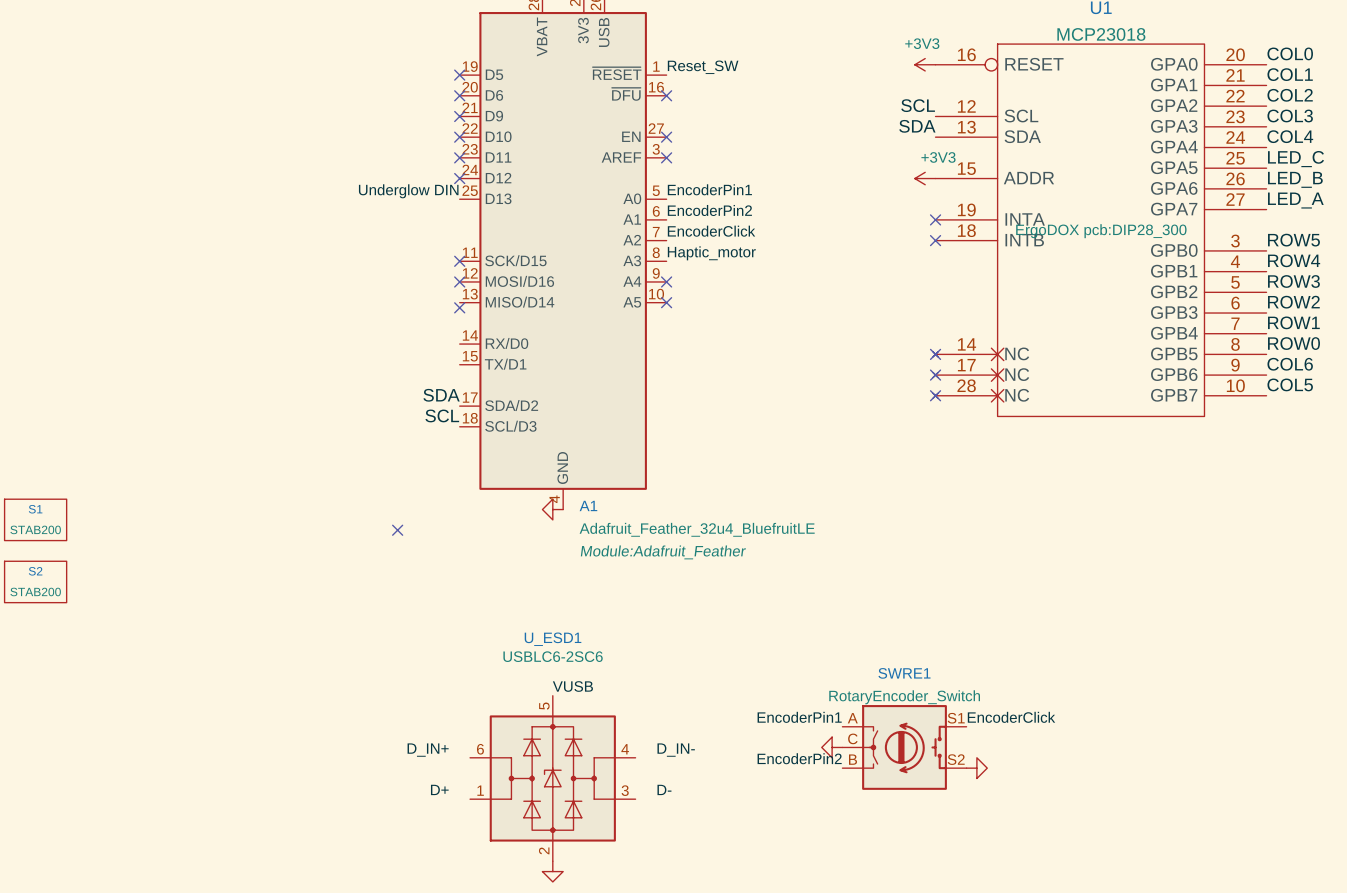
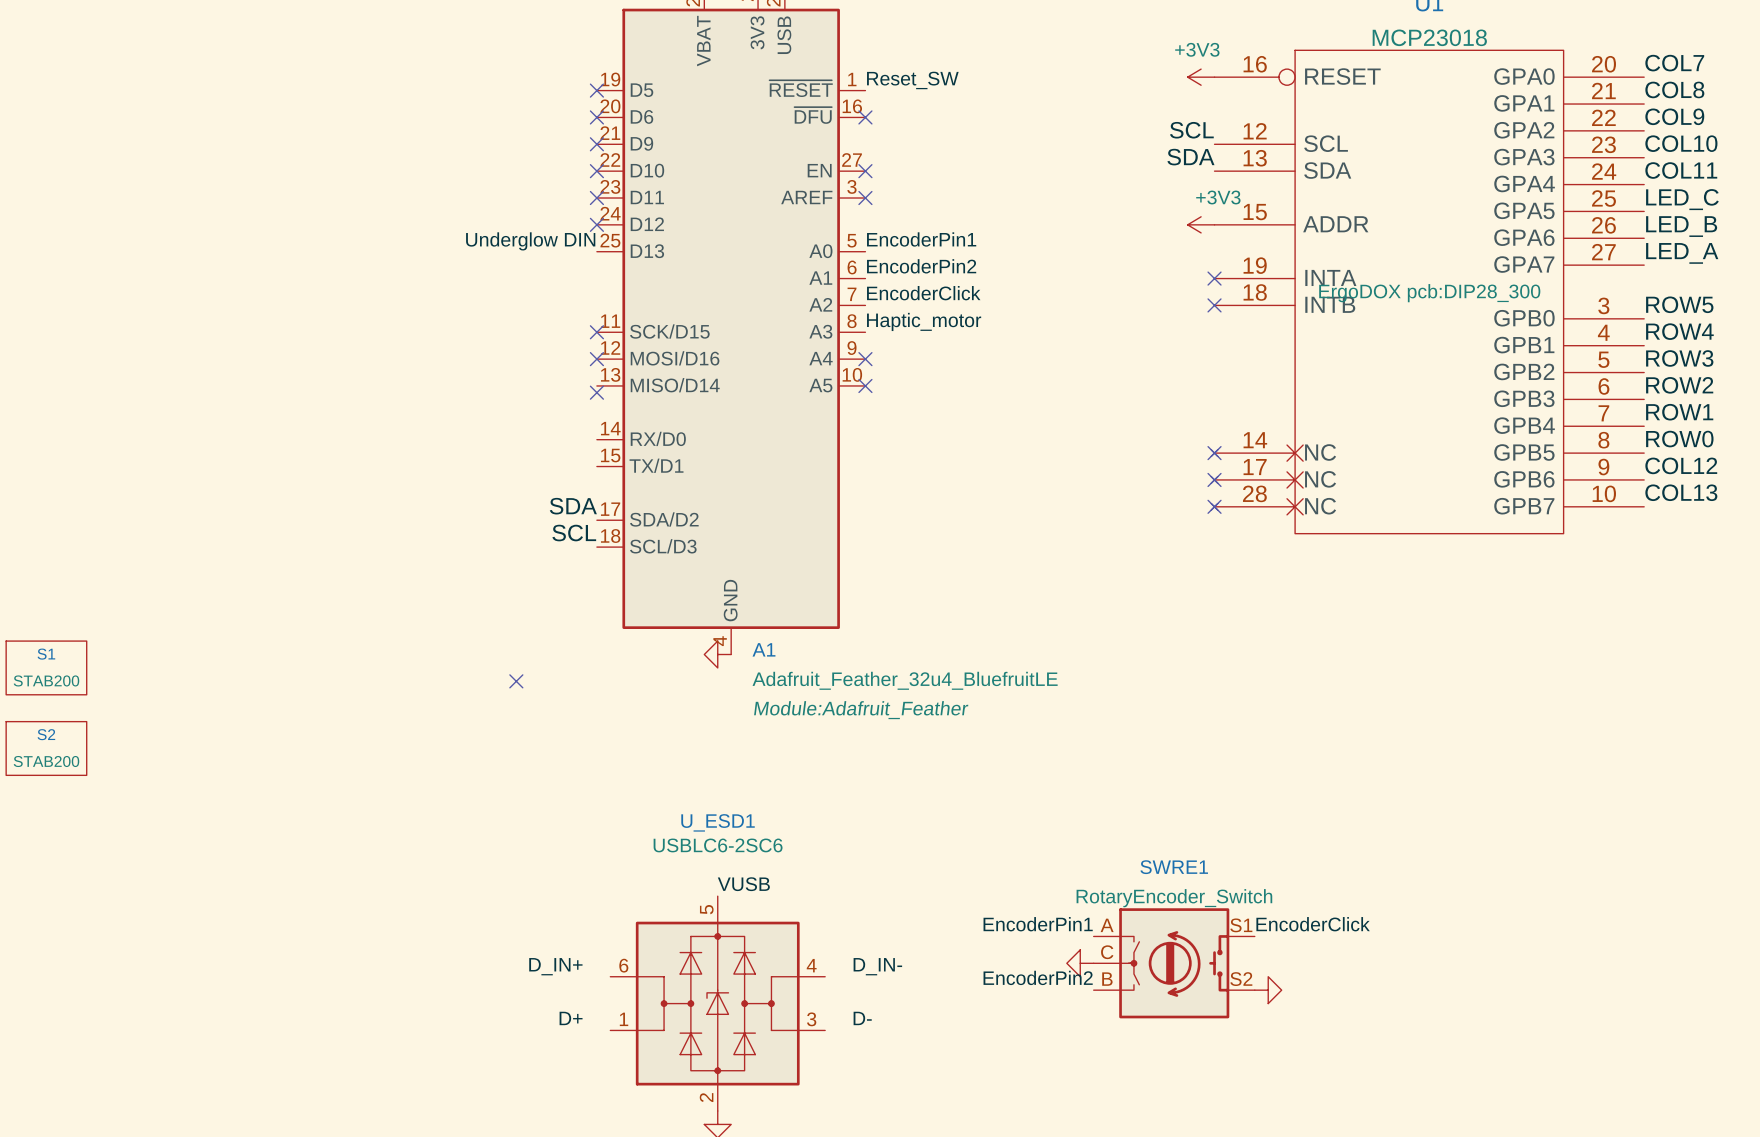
label: COL0 (1290, 53) -> COL7 (1674, 63)
label: COL1 (1290, 74) -> COL8 (1674, 89)
label: COL2 (1290, 95) -> COL9 (1674, 116)
label: COL3 (1290, 115) -> COL10 (1681, 143)
label: COL4 (1290, 136) -> COL11 (1681, 170)
label: COL6 (1290, 364) -> COL12 (1681, 465)
label: COL5 (1290, 384) -> COL13 (1681, 492)

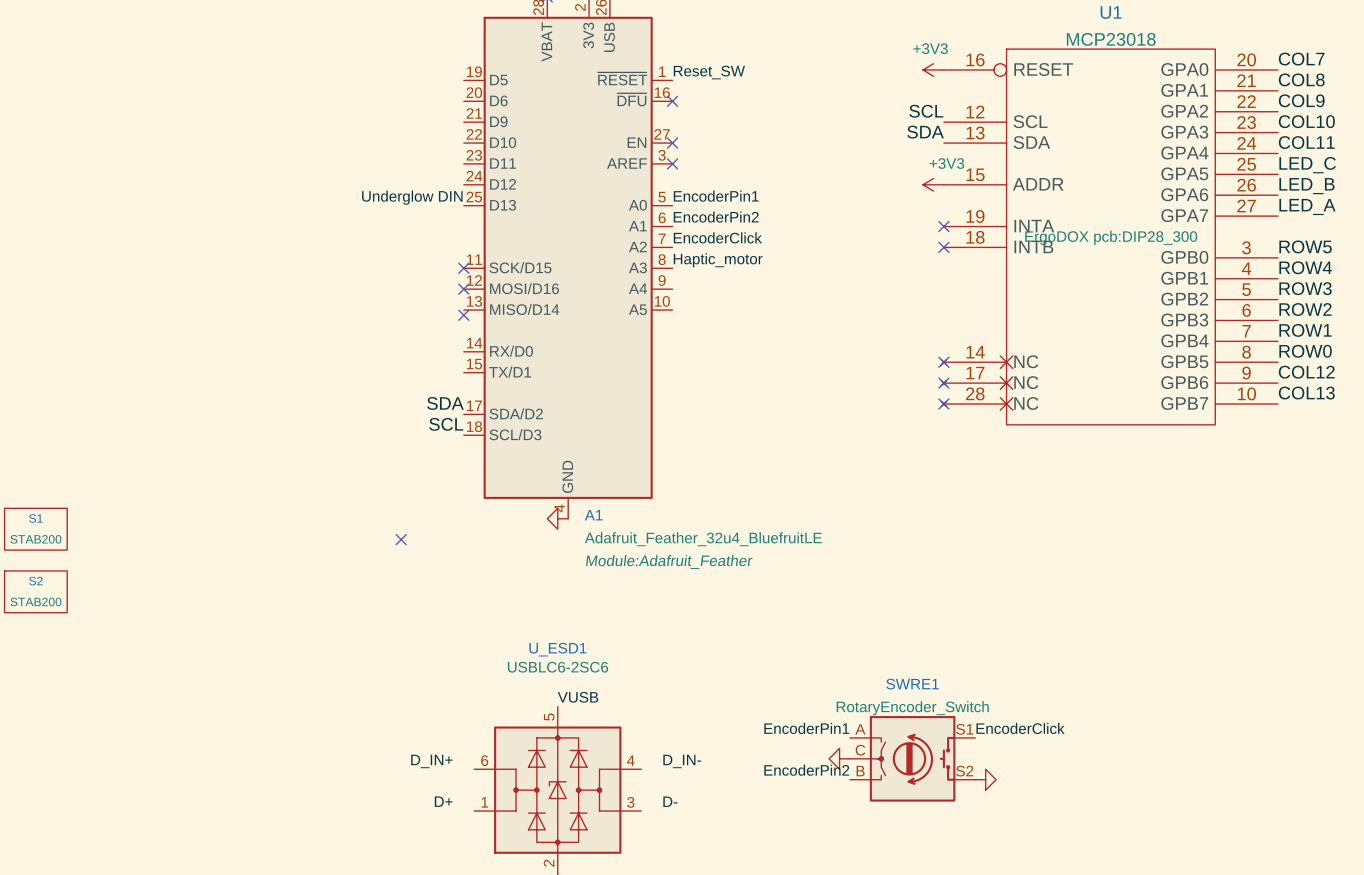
no-connect mark: (596, 90) -> none
no-connect mark: (596, 117) -> none
no-connect mark: (596, 144) -> none
no-connect mark: (596, 171) -> none
no-connect mark: (596, 198) -> none
no-connect mark: (596, 224) -> none
no-connect mark: (865, 359) -> none
no-connect mark: (865, 385) -> none

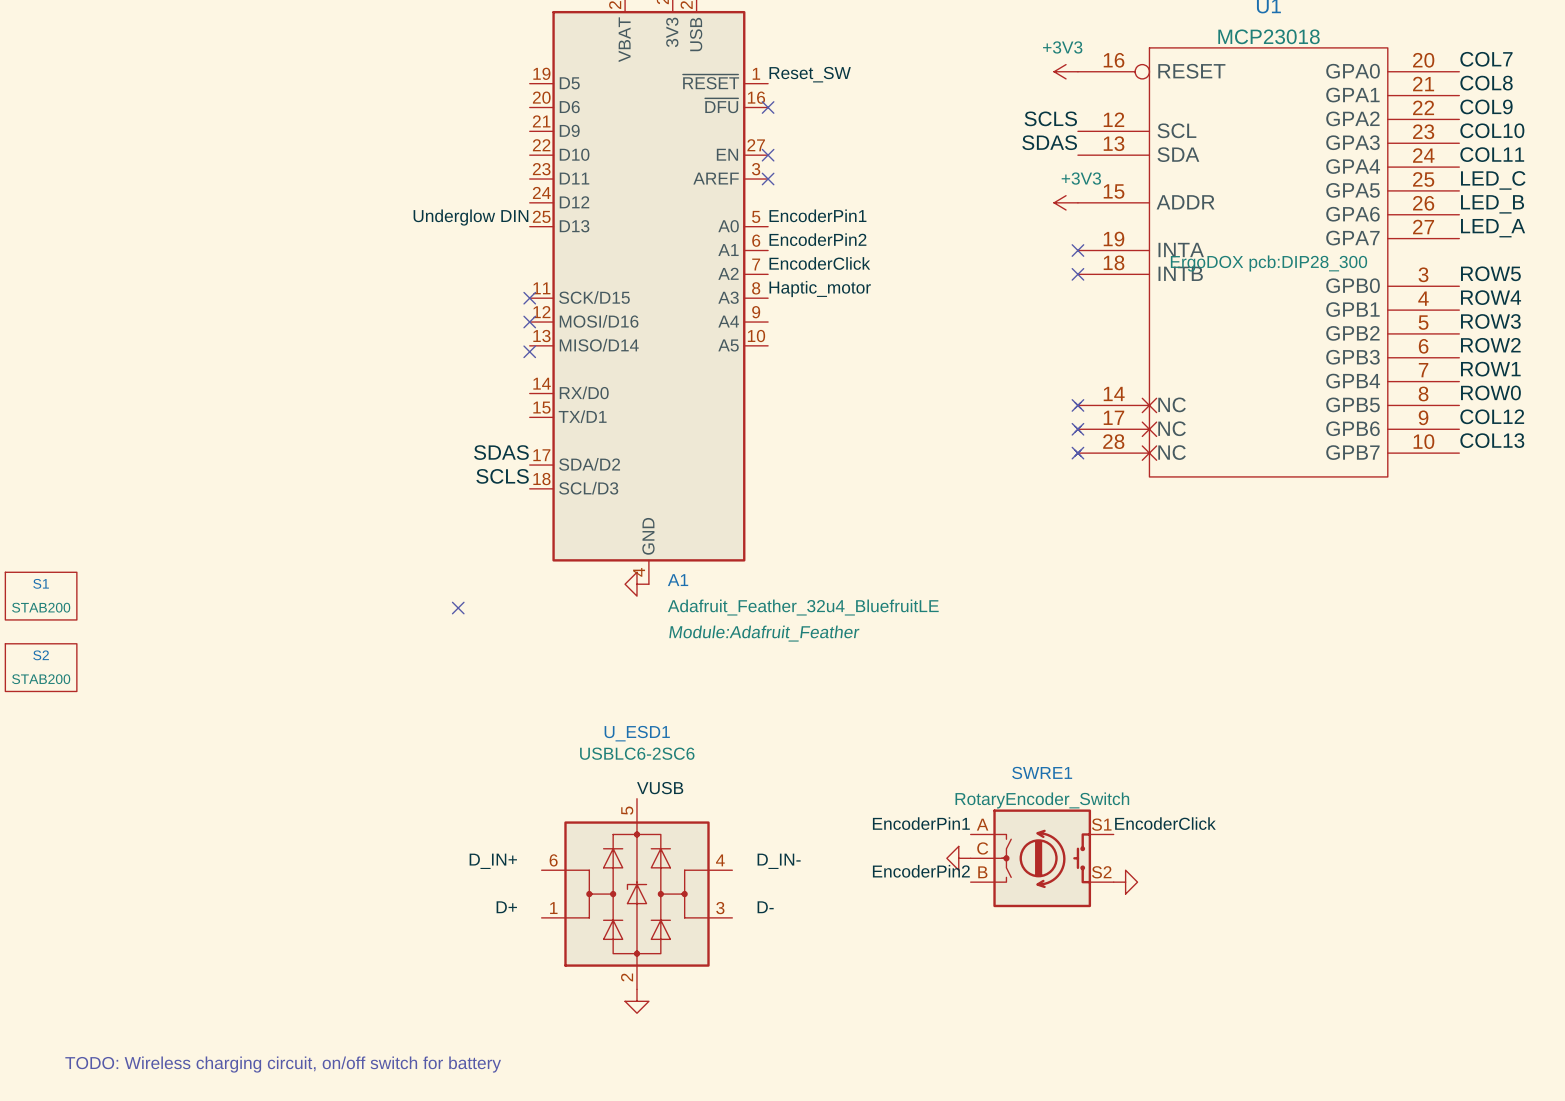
label: SCL (926, 111) -> SCLS (1050, 118)
label: SDA (925, 132) -> SDAS (1049, 142)
label: SDA (445, 403) -> SDAS (501, 452)
label: SCL (446, 424) -> SCLS (502, 476)

